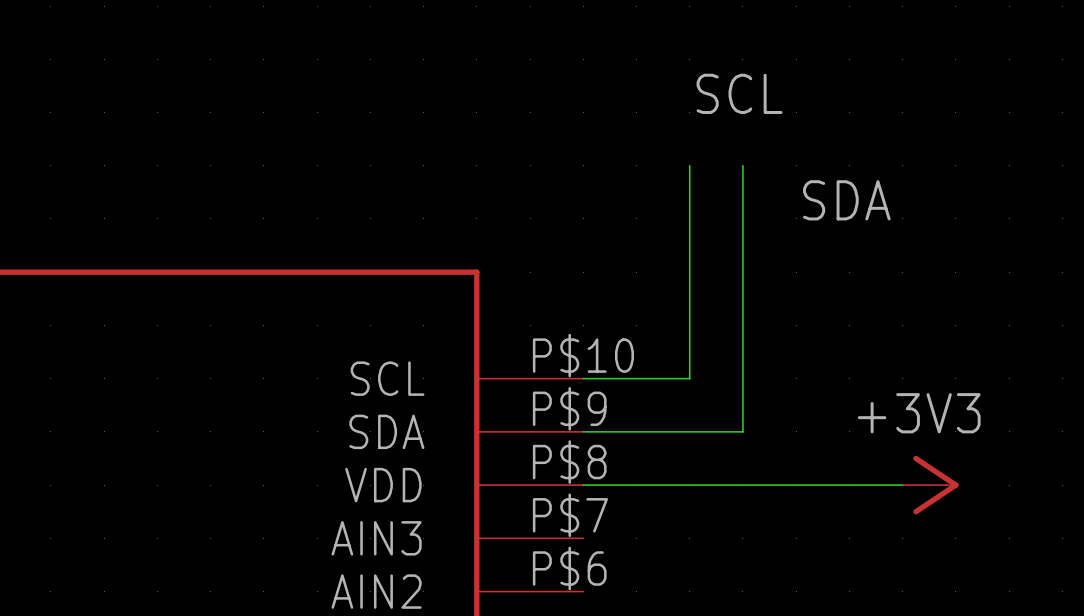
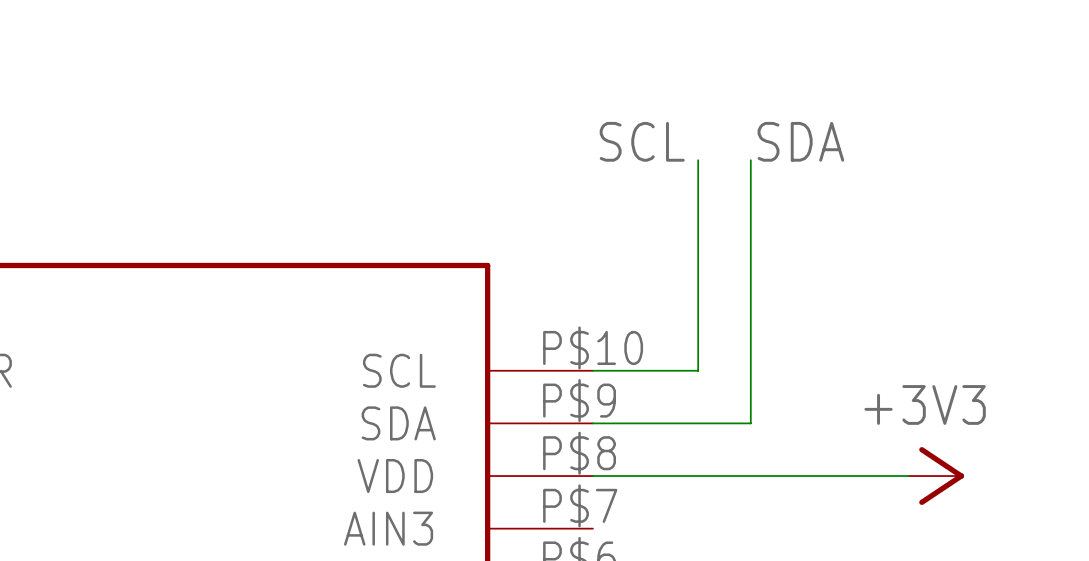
label position: SCL (739, 93) -> SCL (642, 141)
label position: SDA (846, 200) -> SDA (800, 141)

